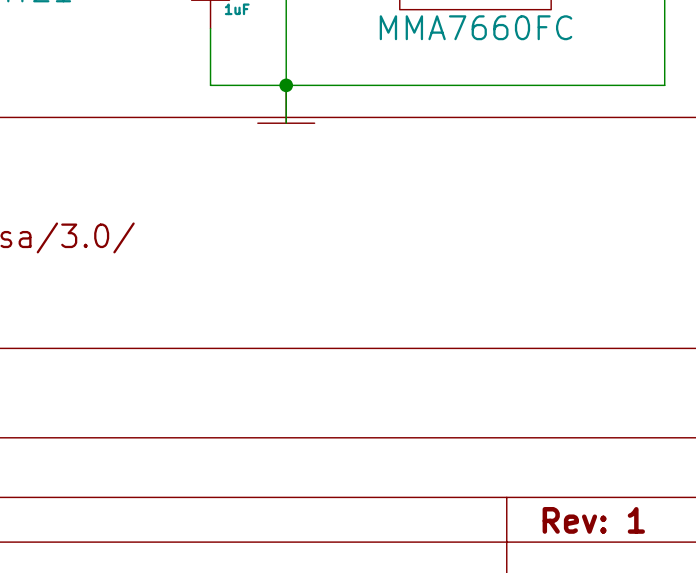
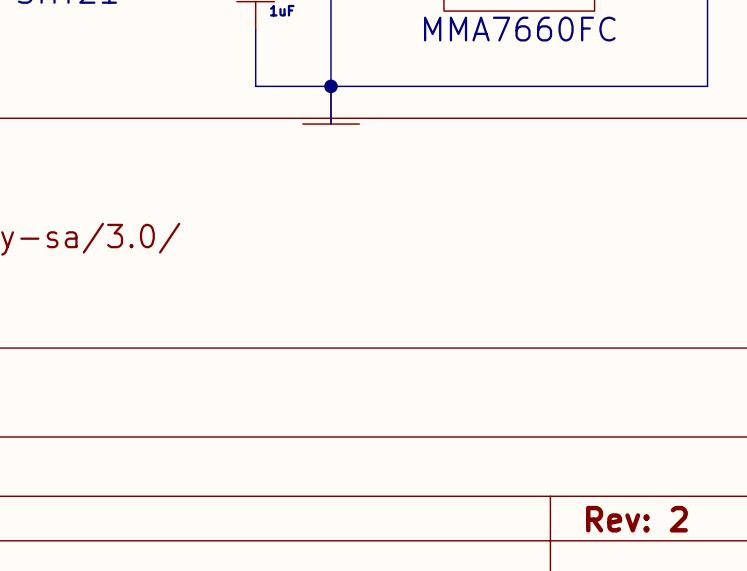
title block: Rev: 1 (593, 520) -> Rev: 2 (636, 519)

